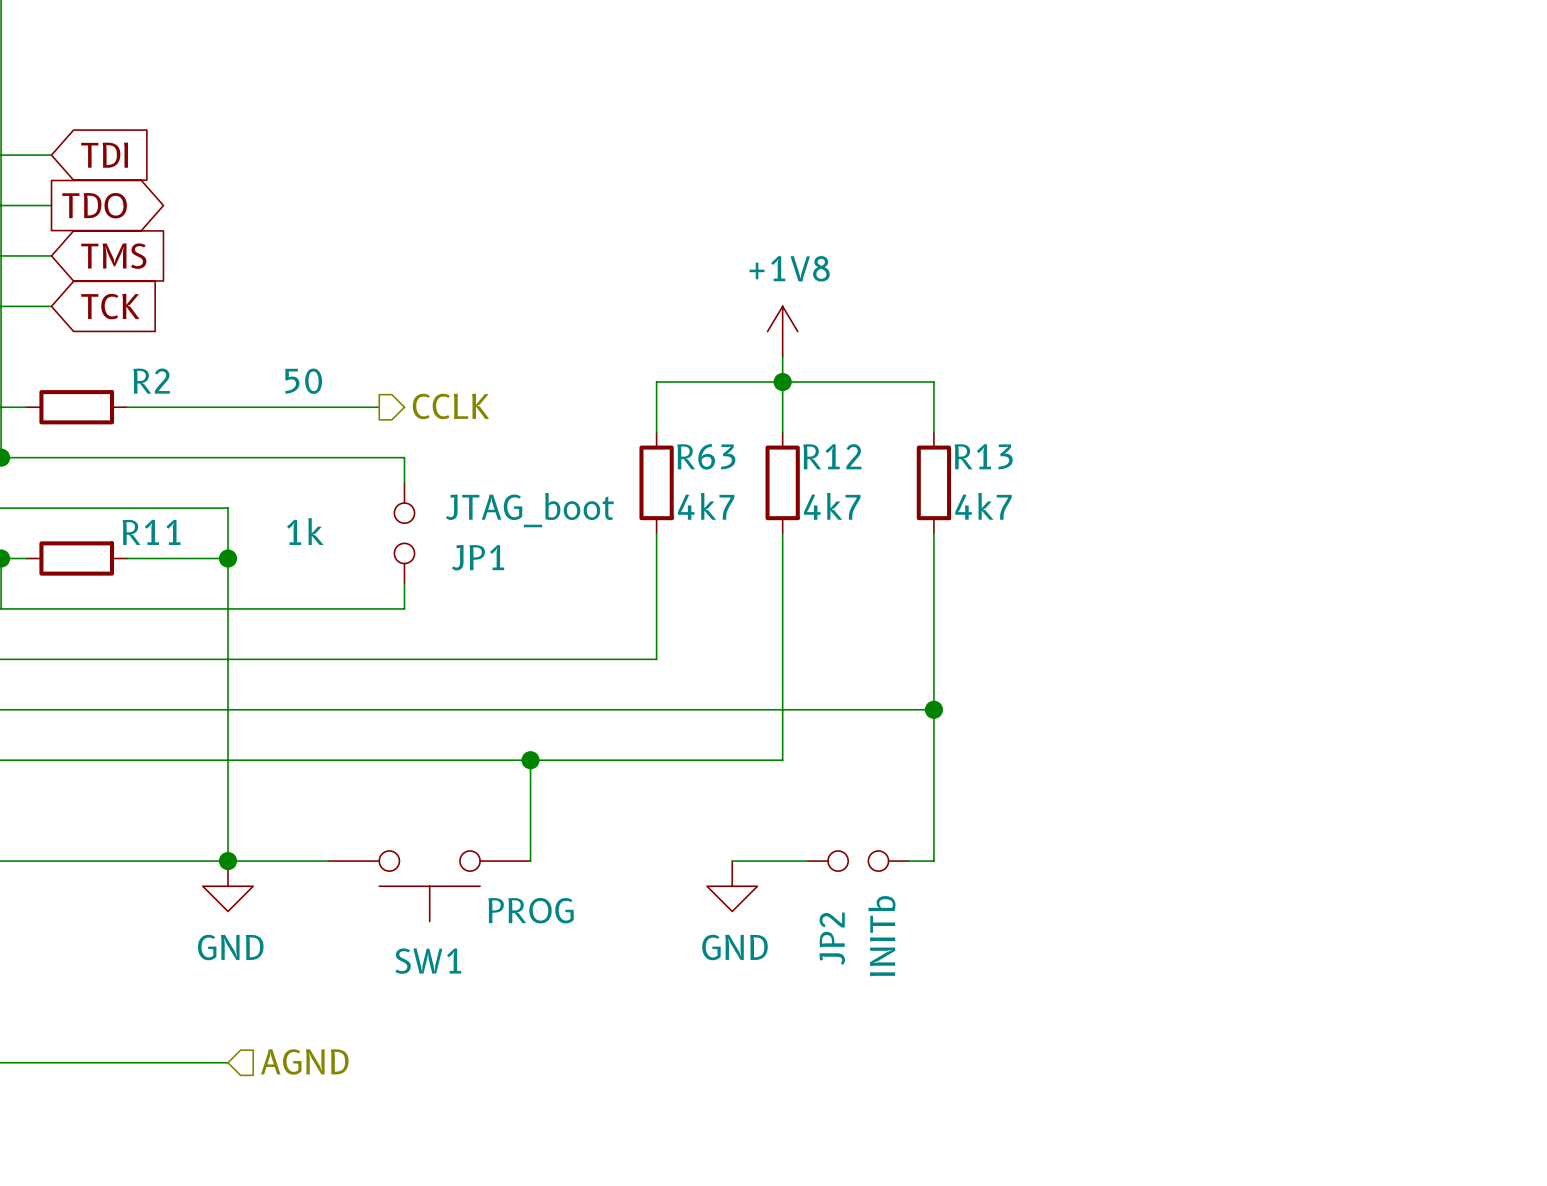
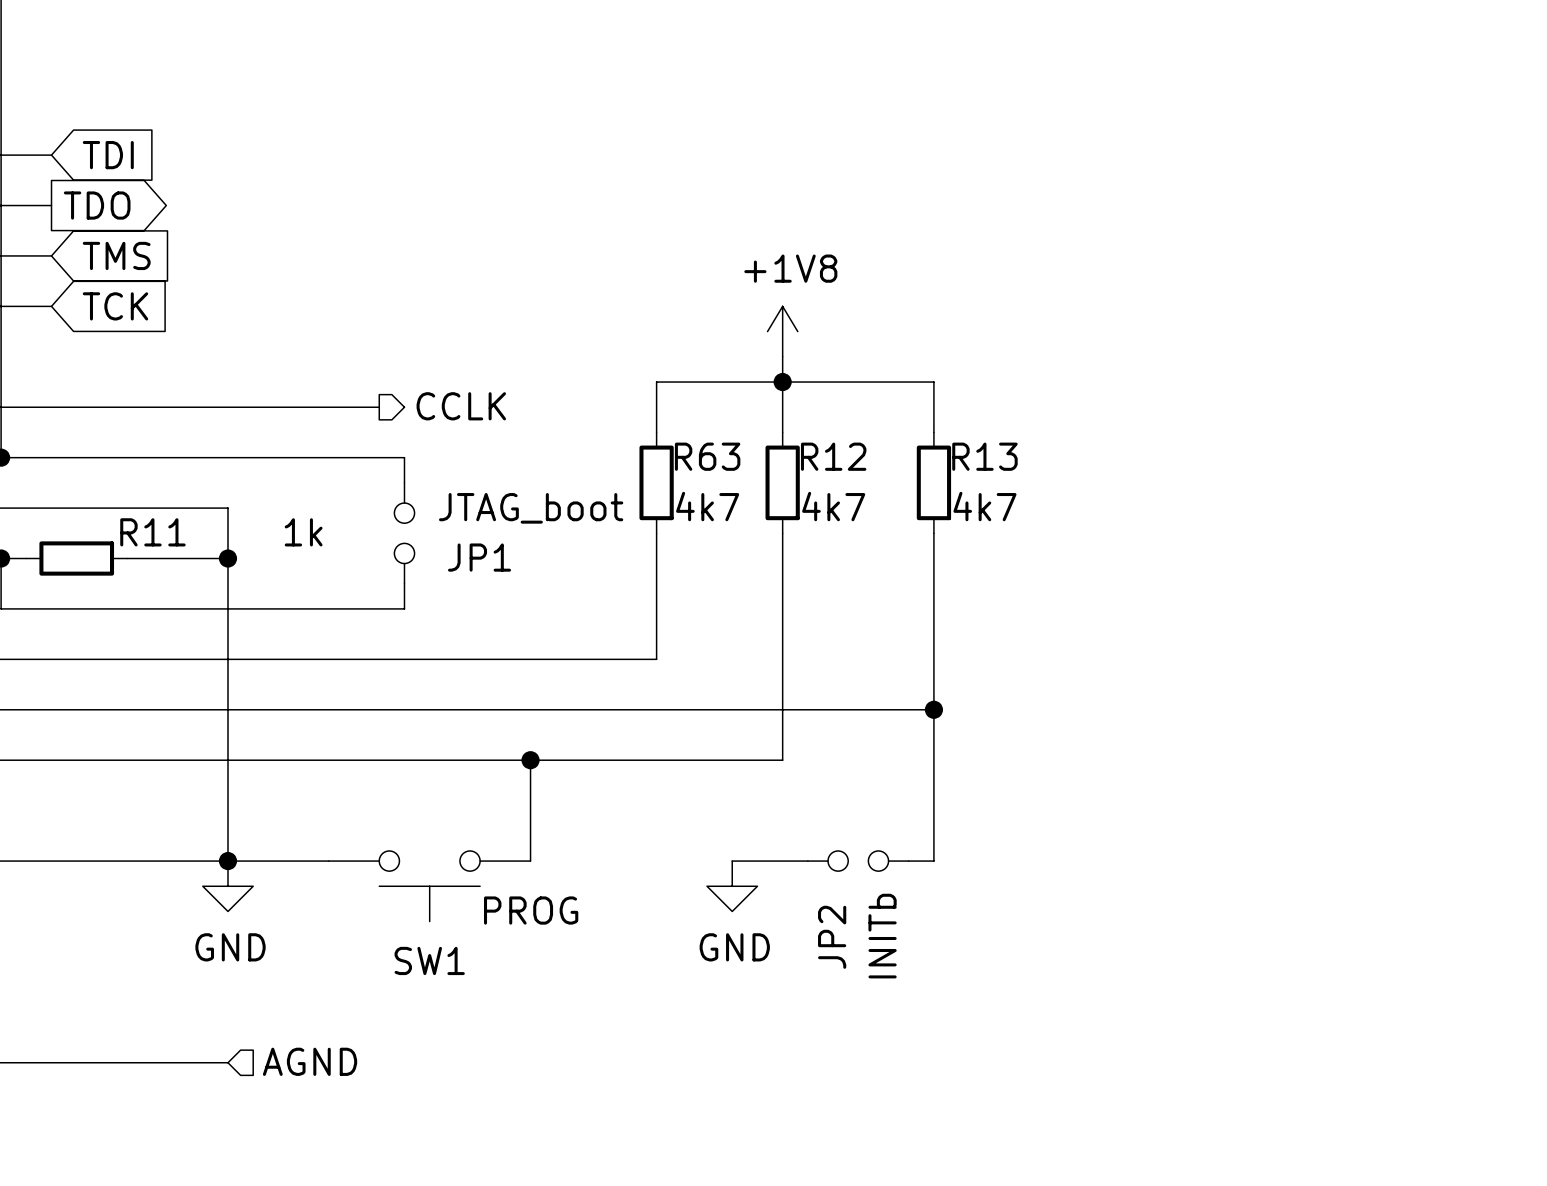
wire: none -> (26, 407) (127, 407)
R2: 50 (76, 407) -> none

